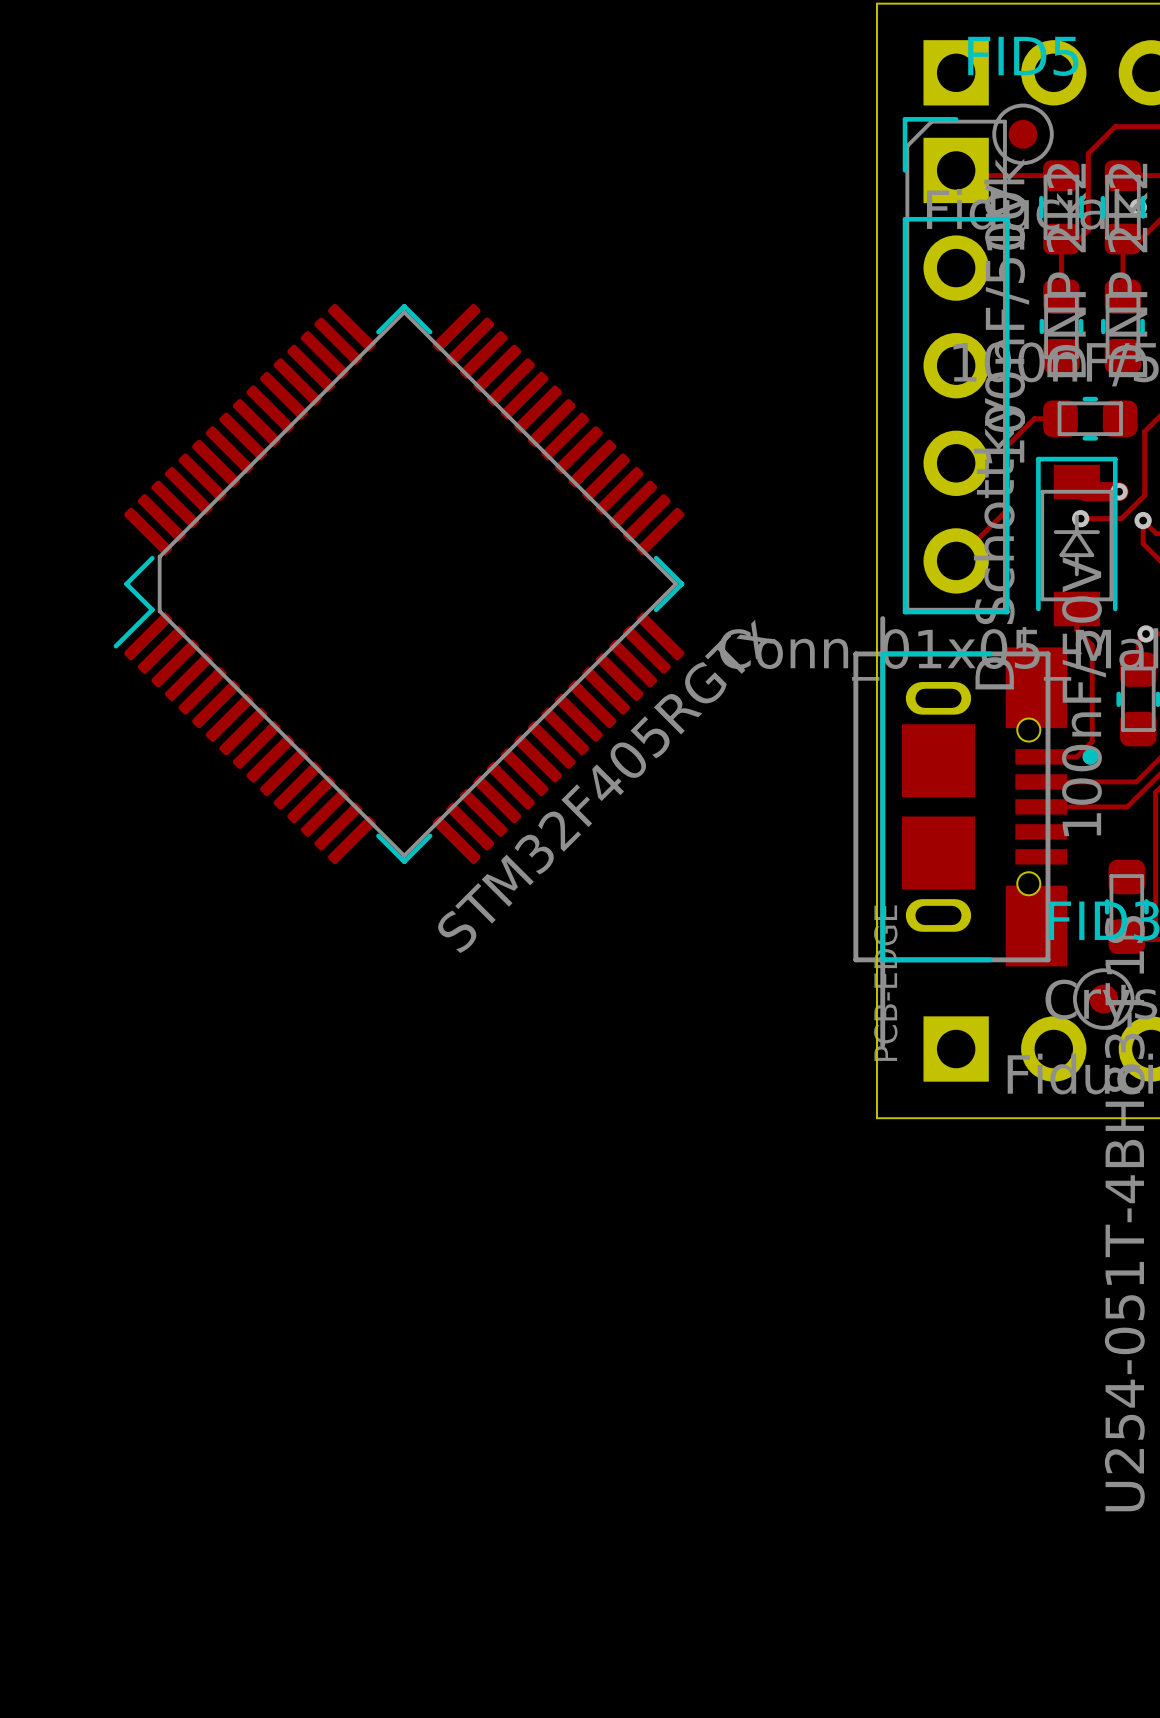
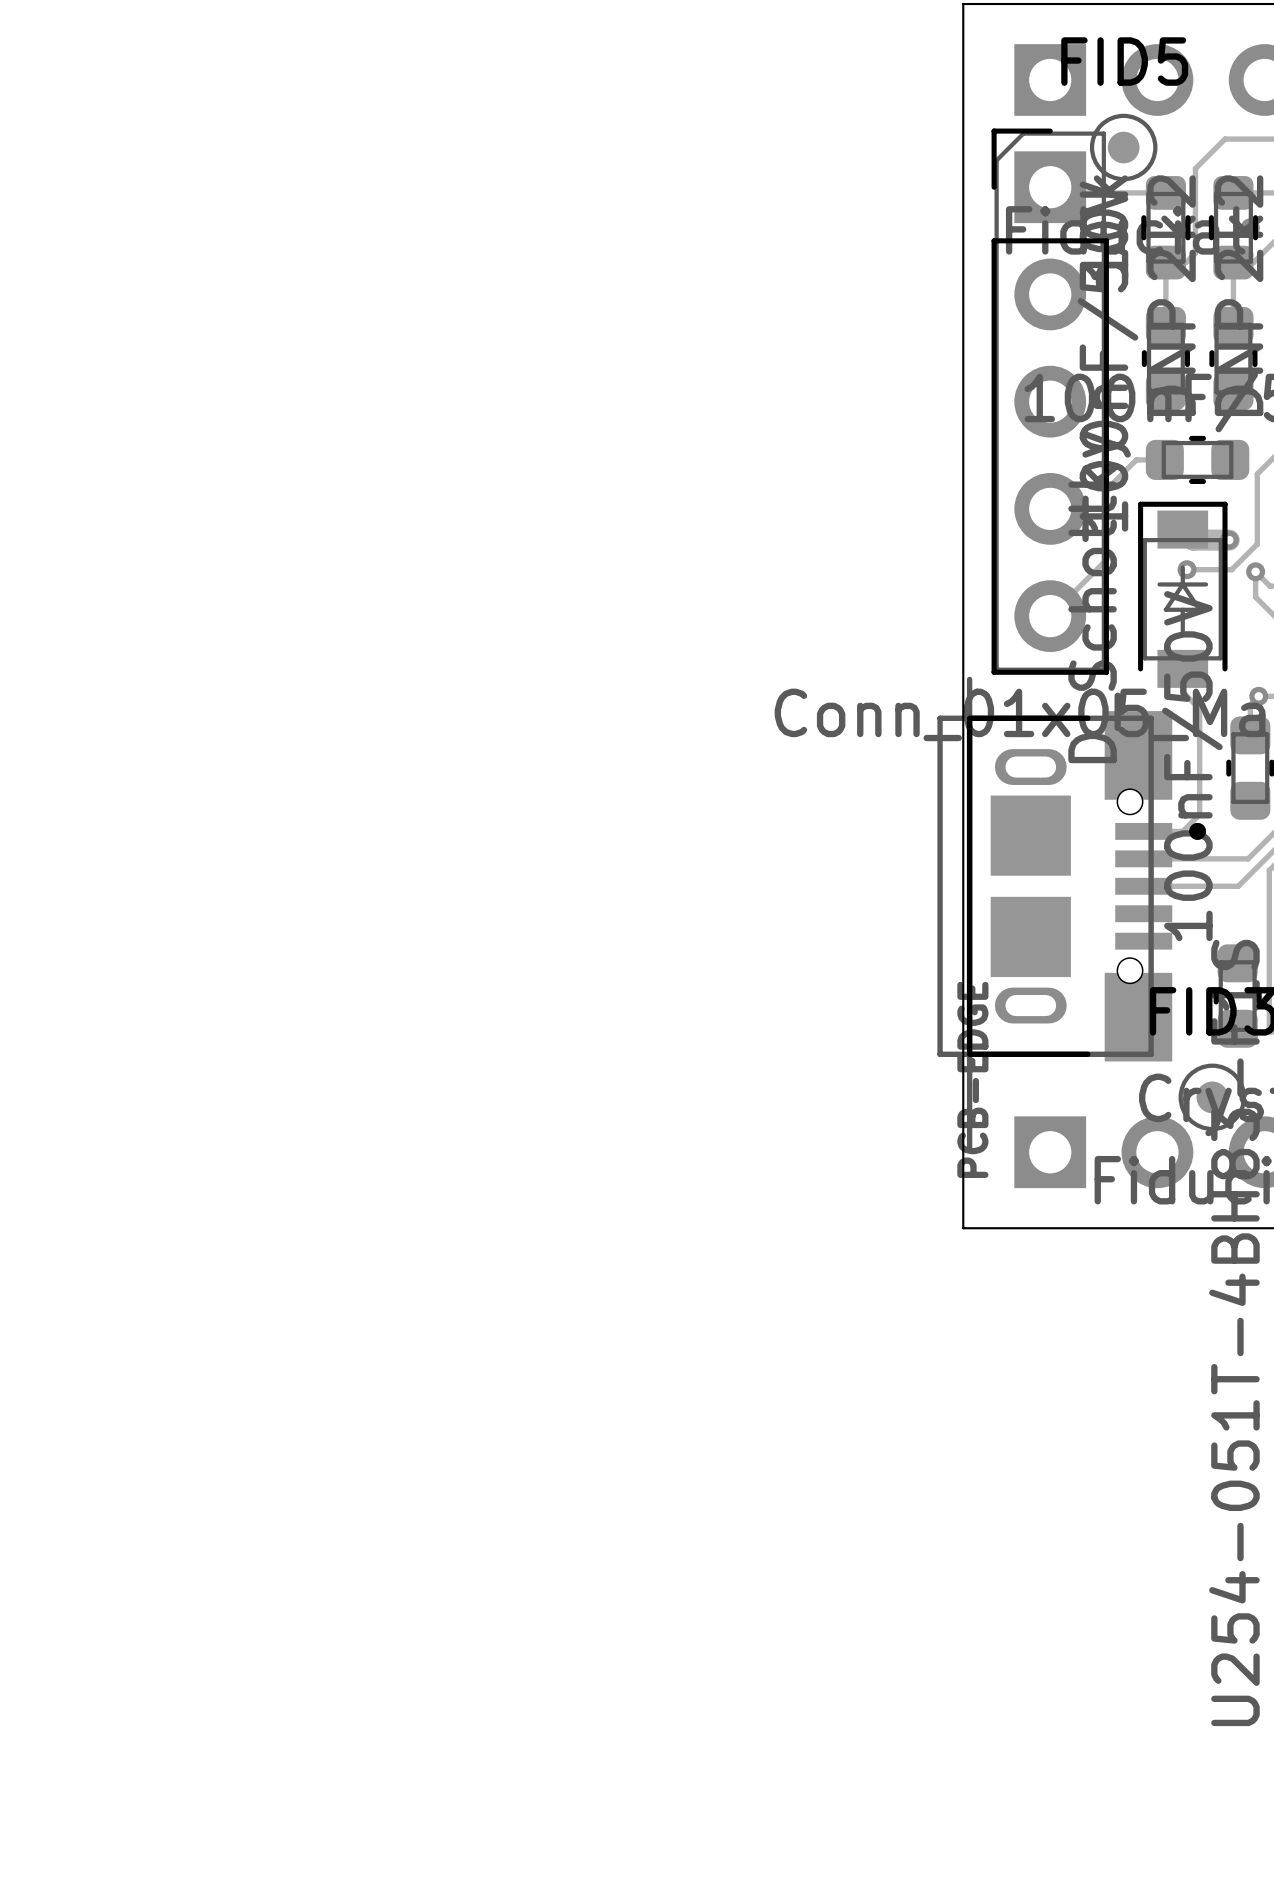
part: STM32F405RGTx (398, 583) -> none

